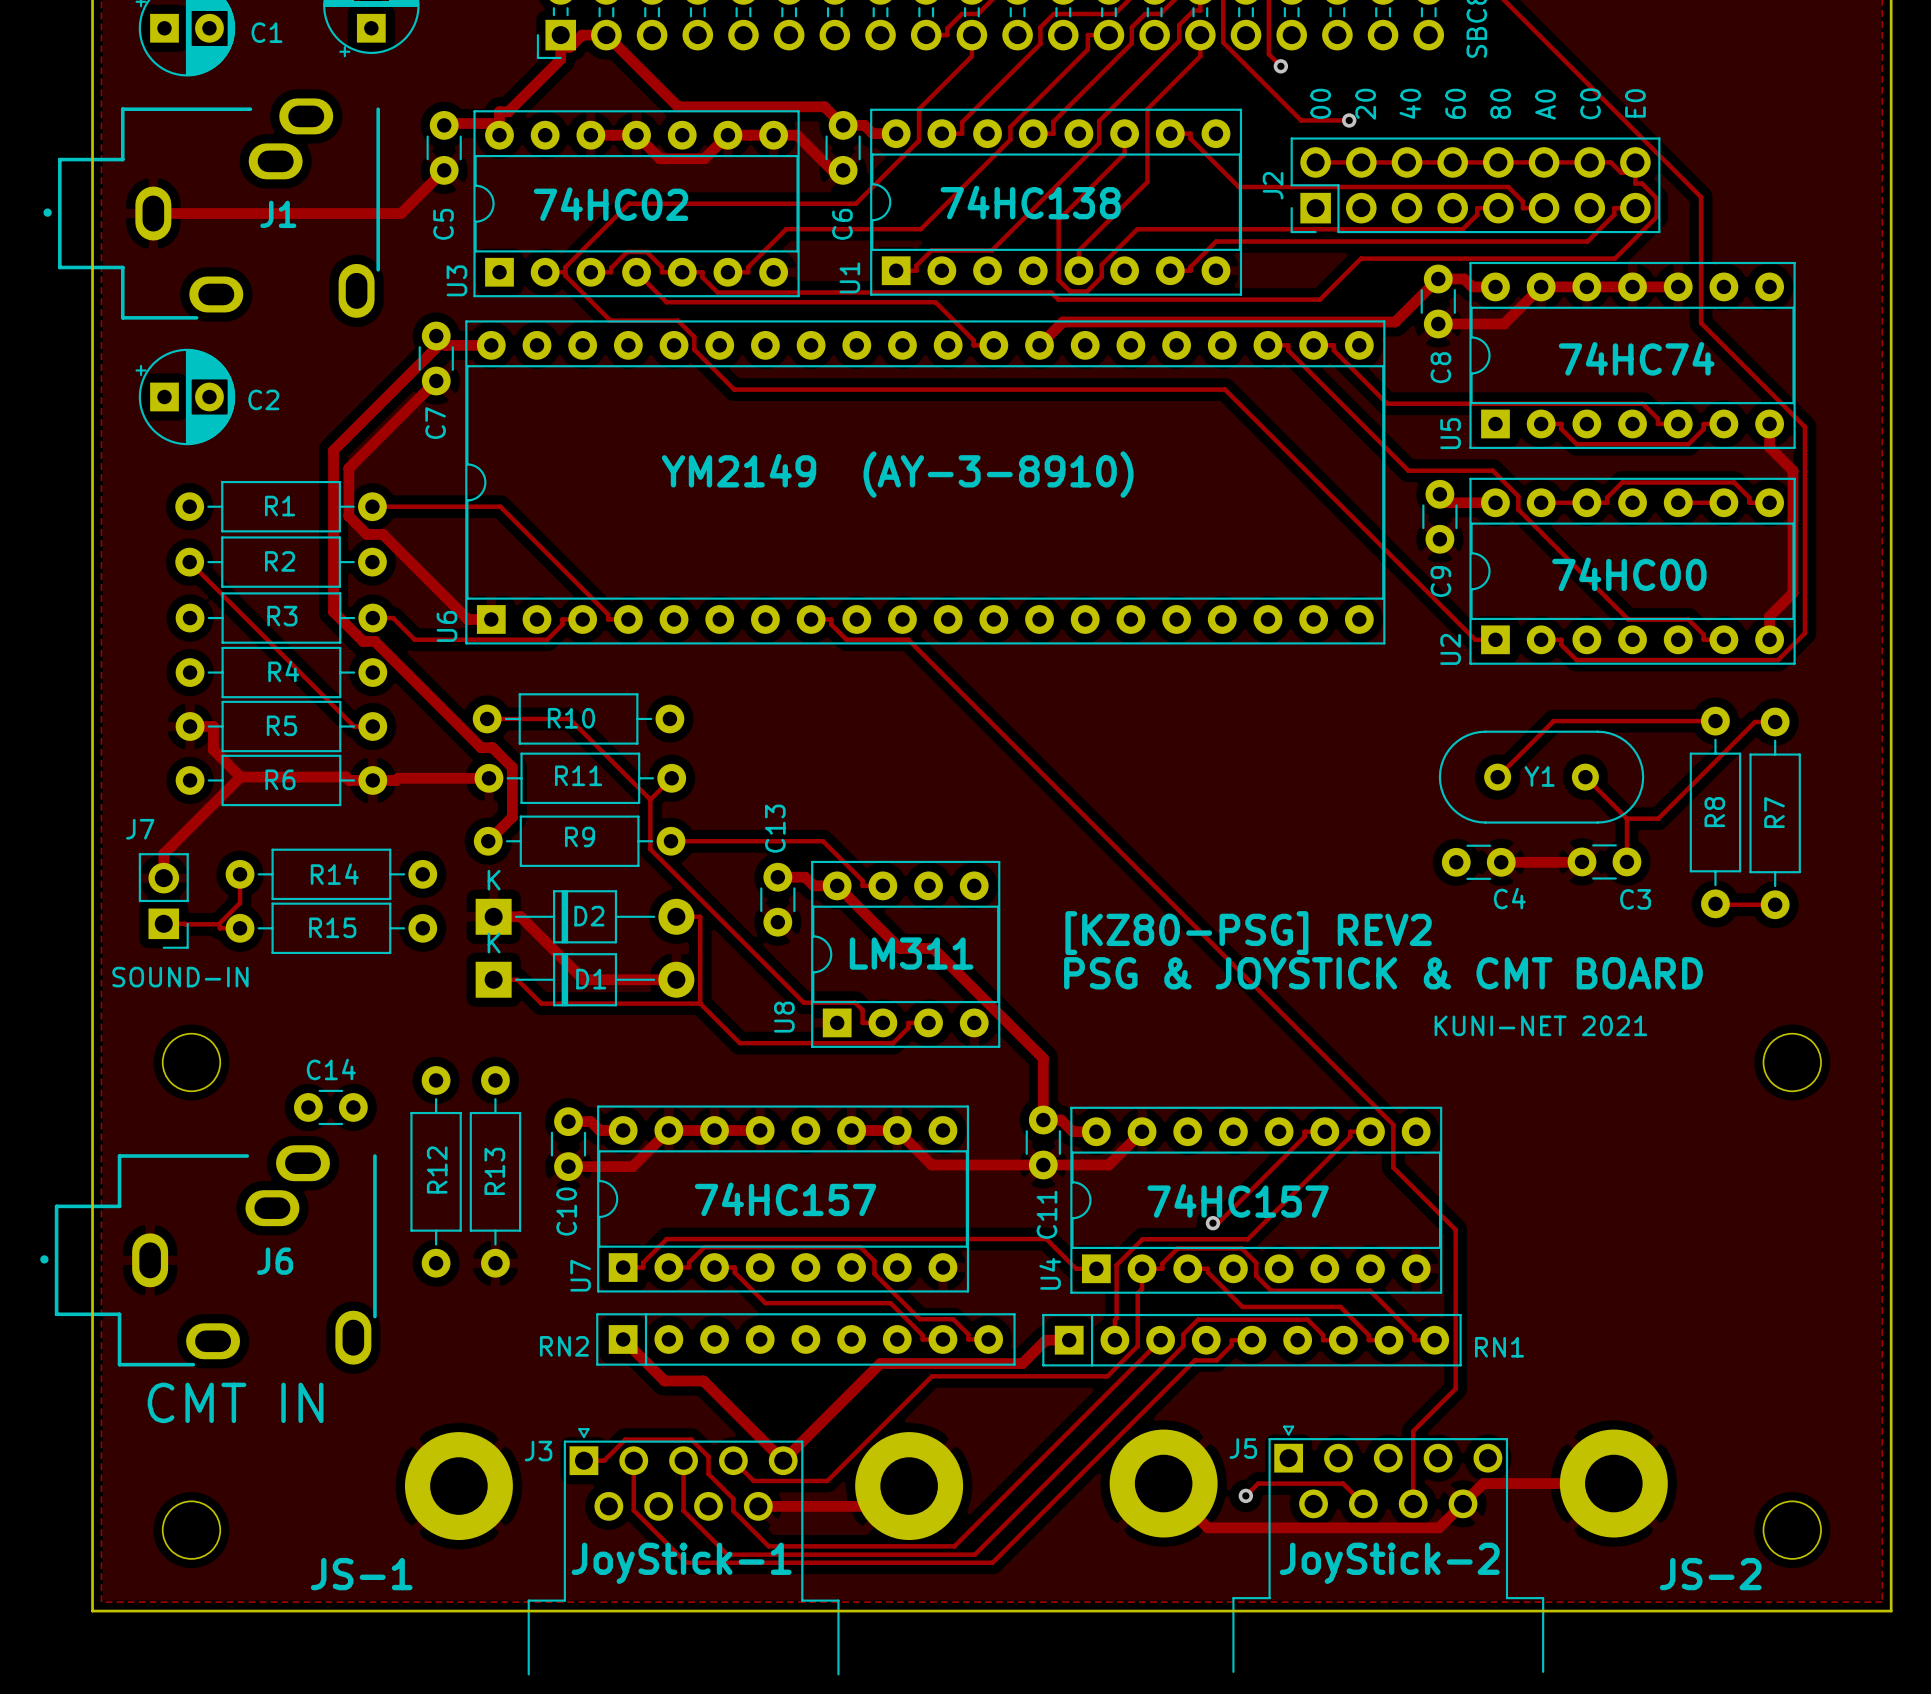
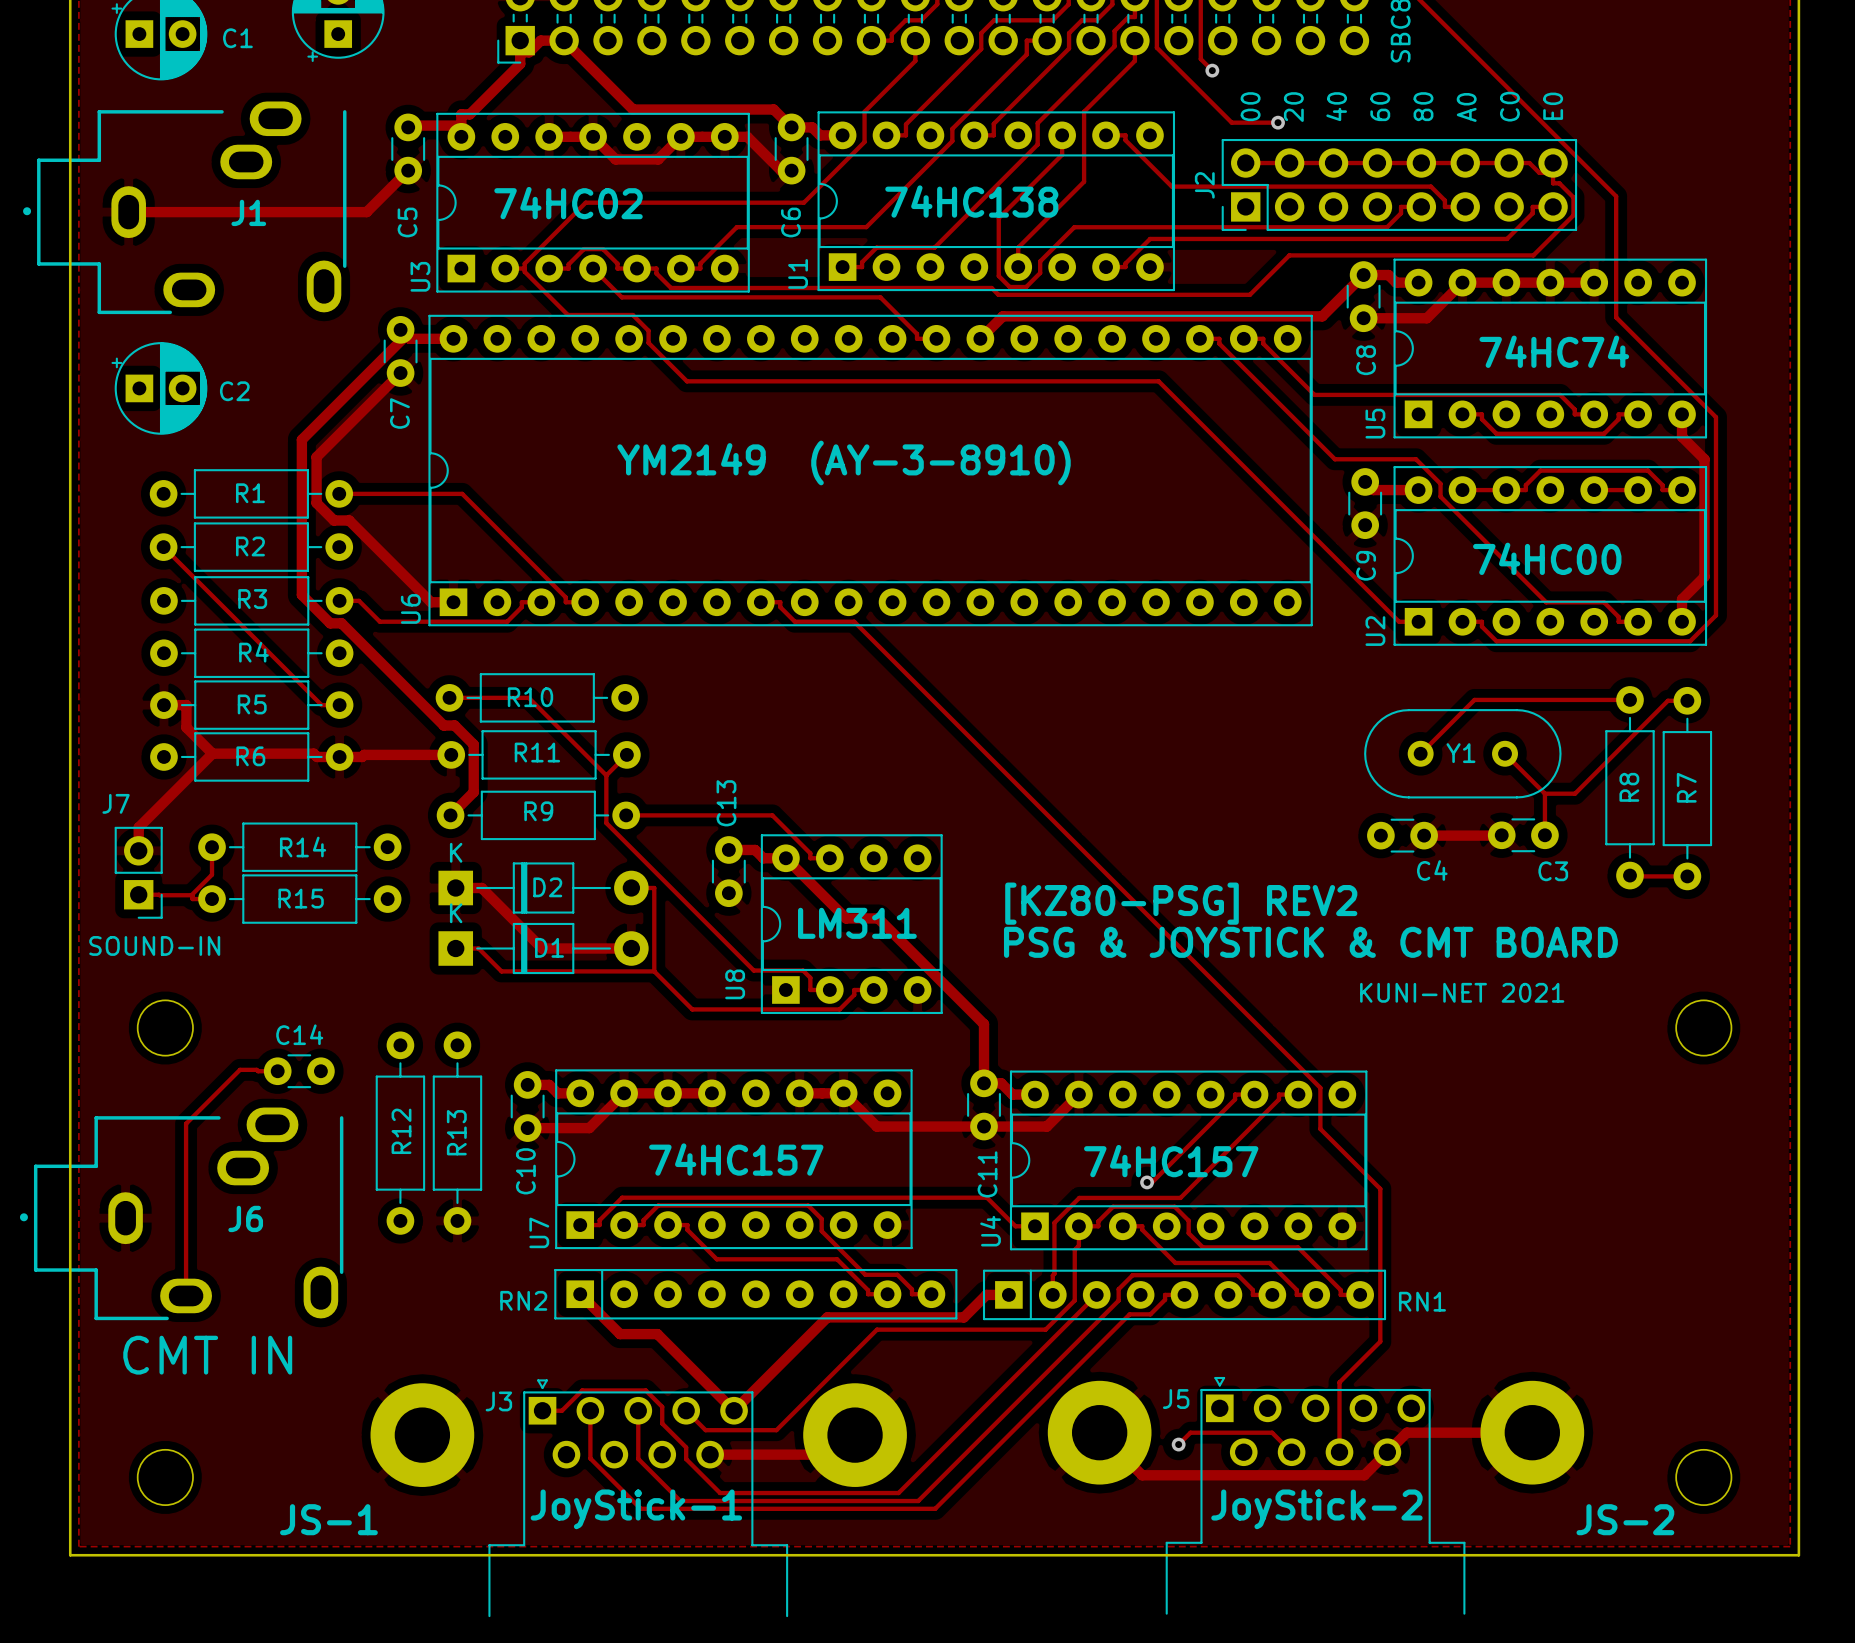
track: none -> (277, 1071) (240, 1069) (186, 1123) (186, 1295)

